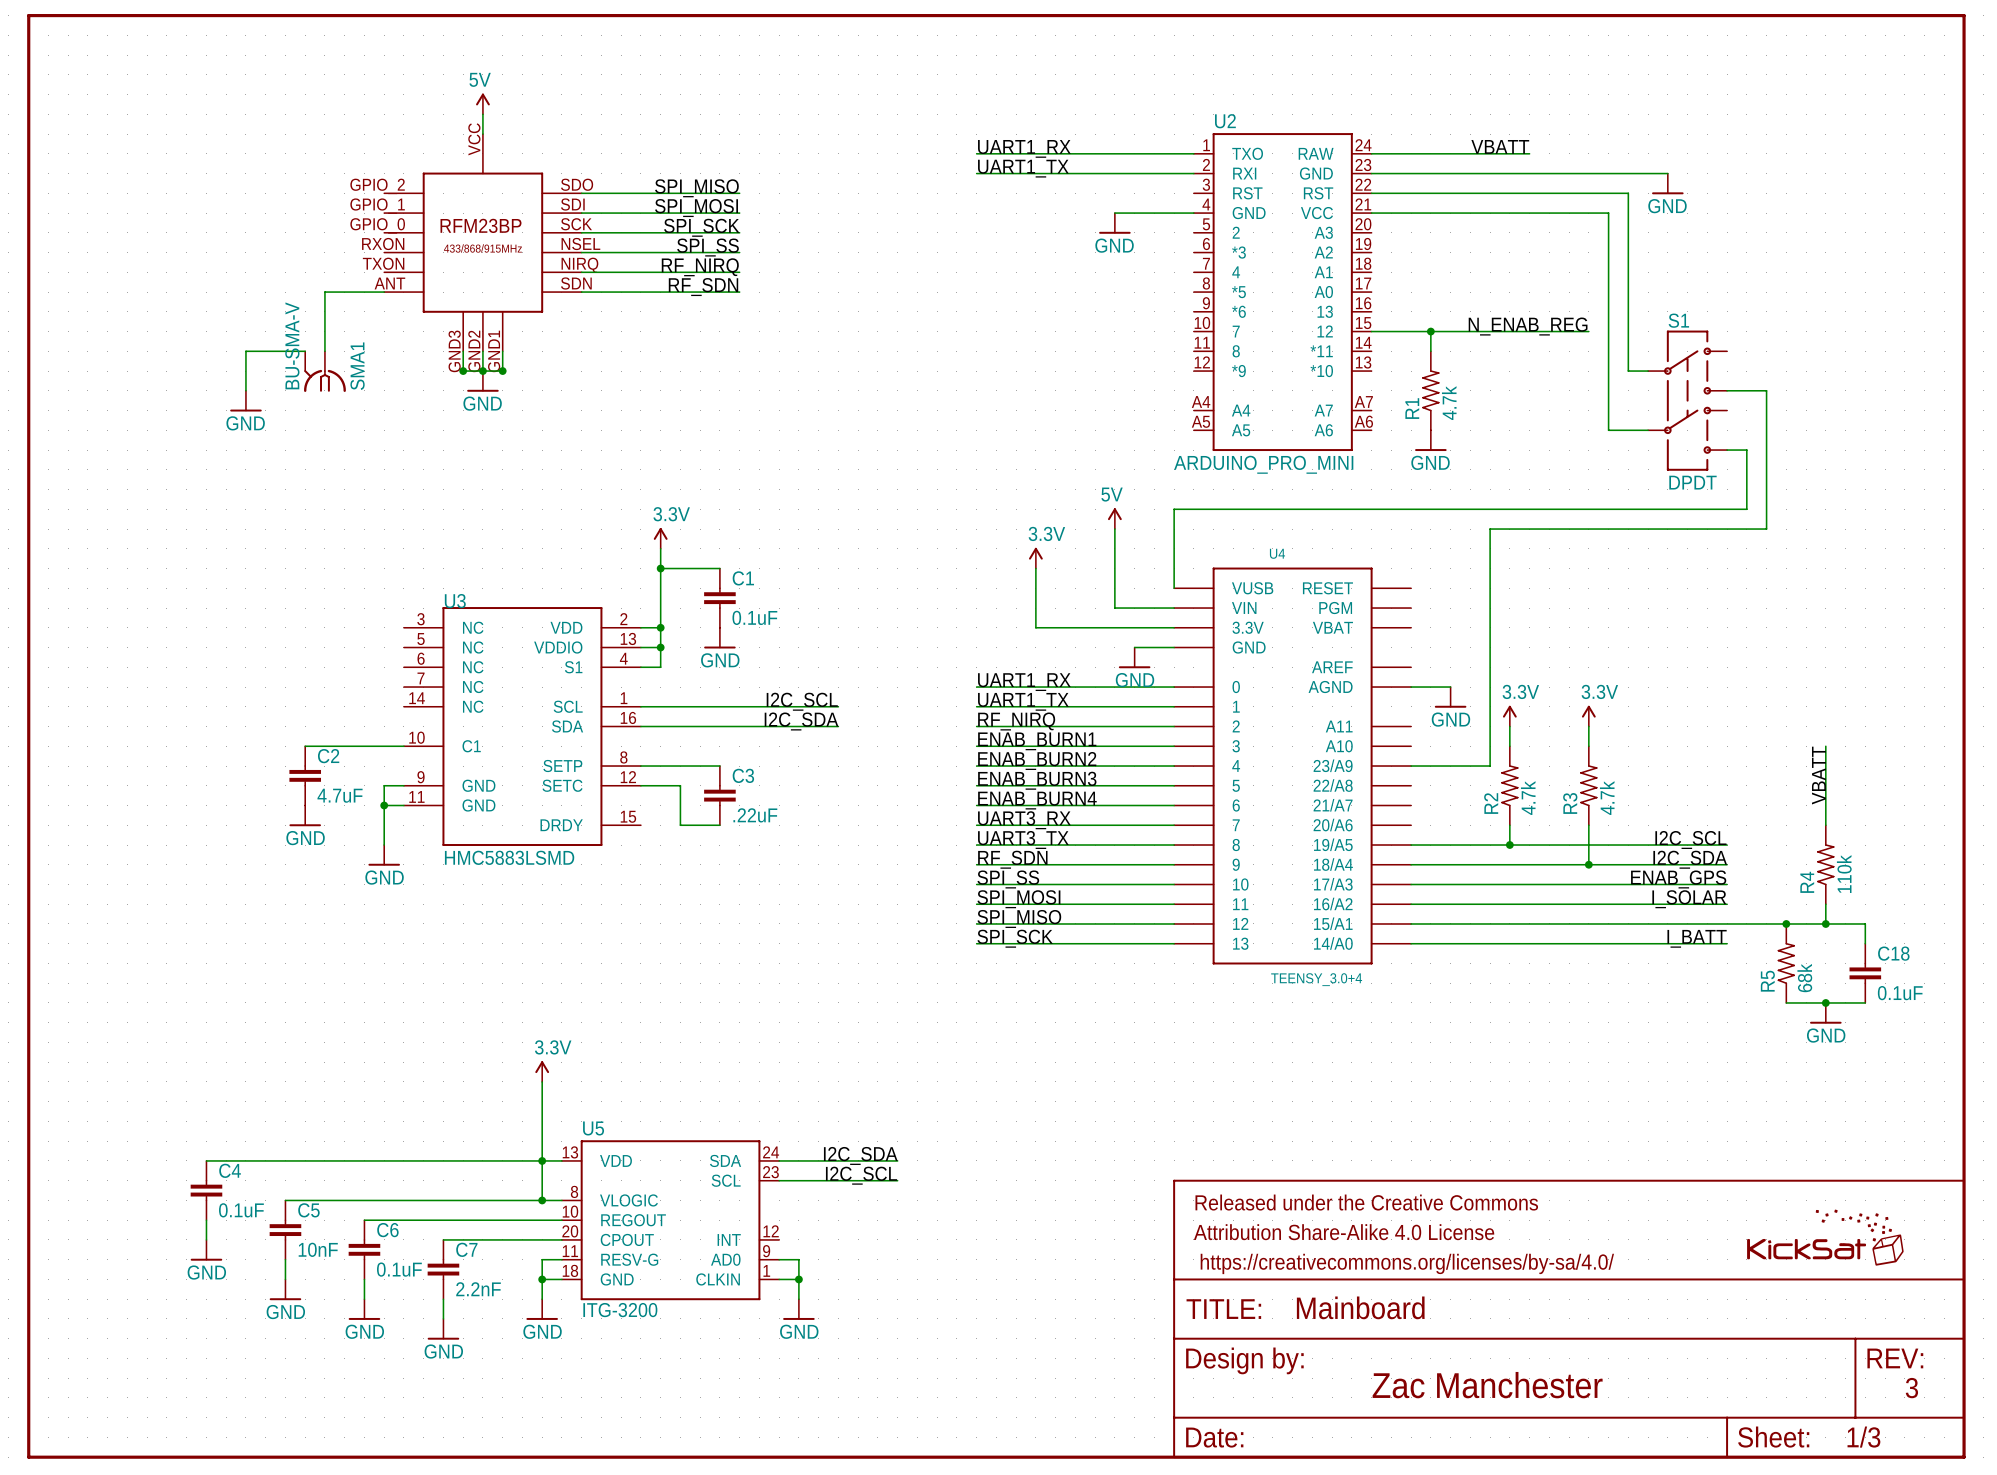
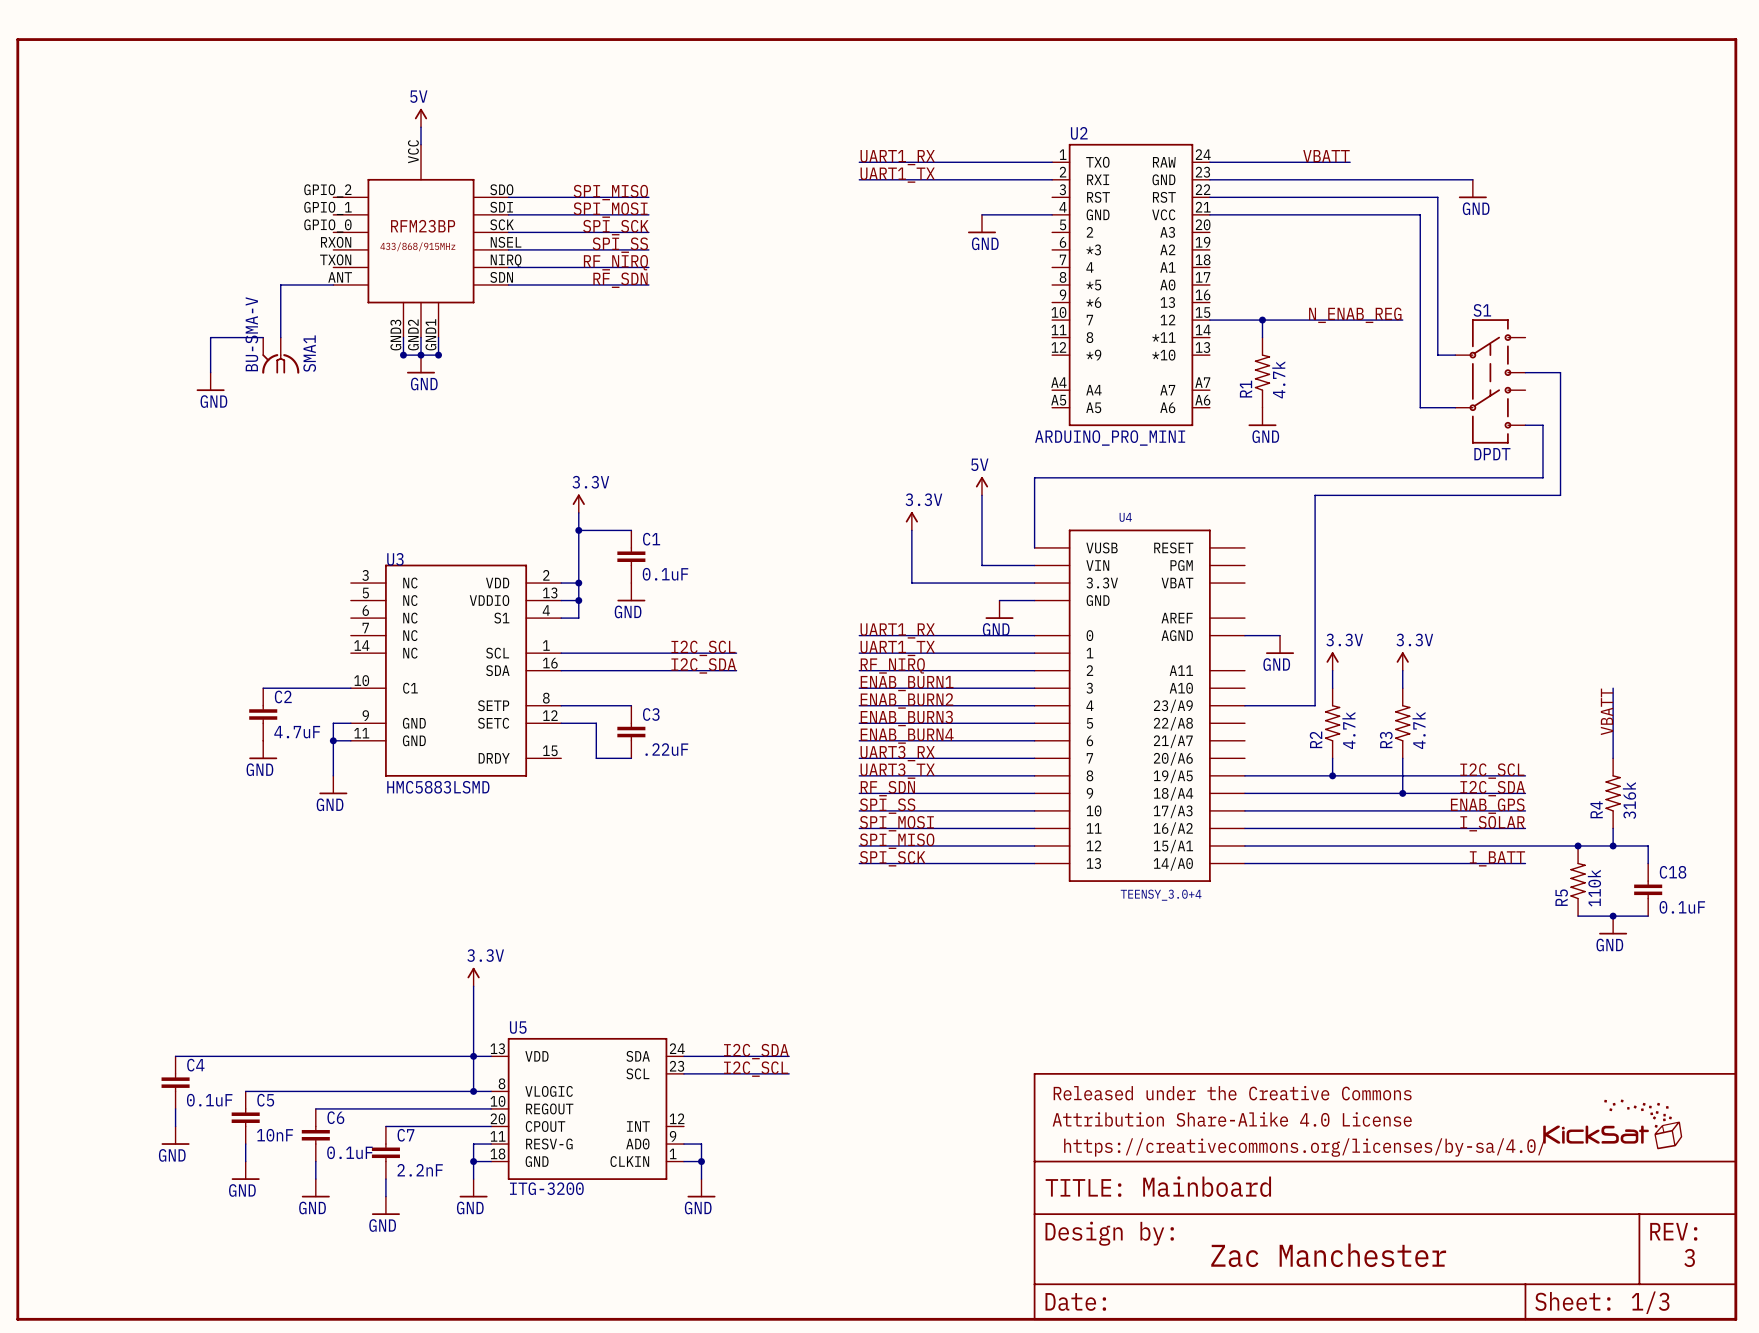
R4 value: 110k (1844, 874) -> 316k (1629, 800)
R5 value: 68k (1804, 978) -> 110k (1594, 888)

